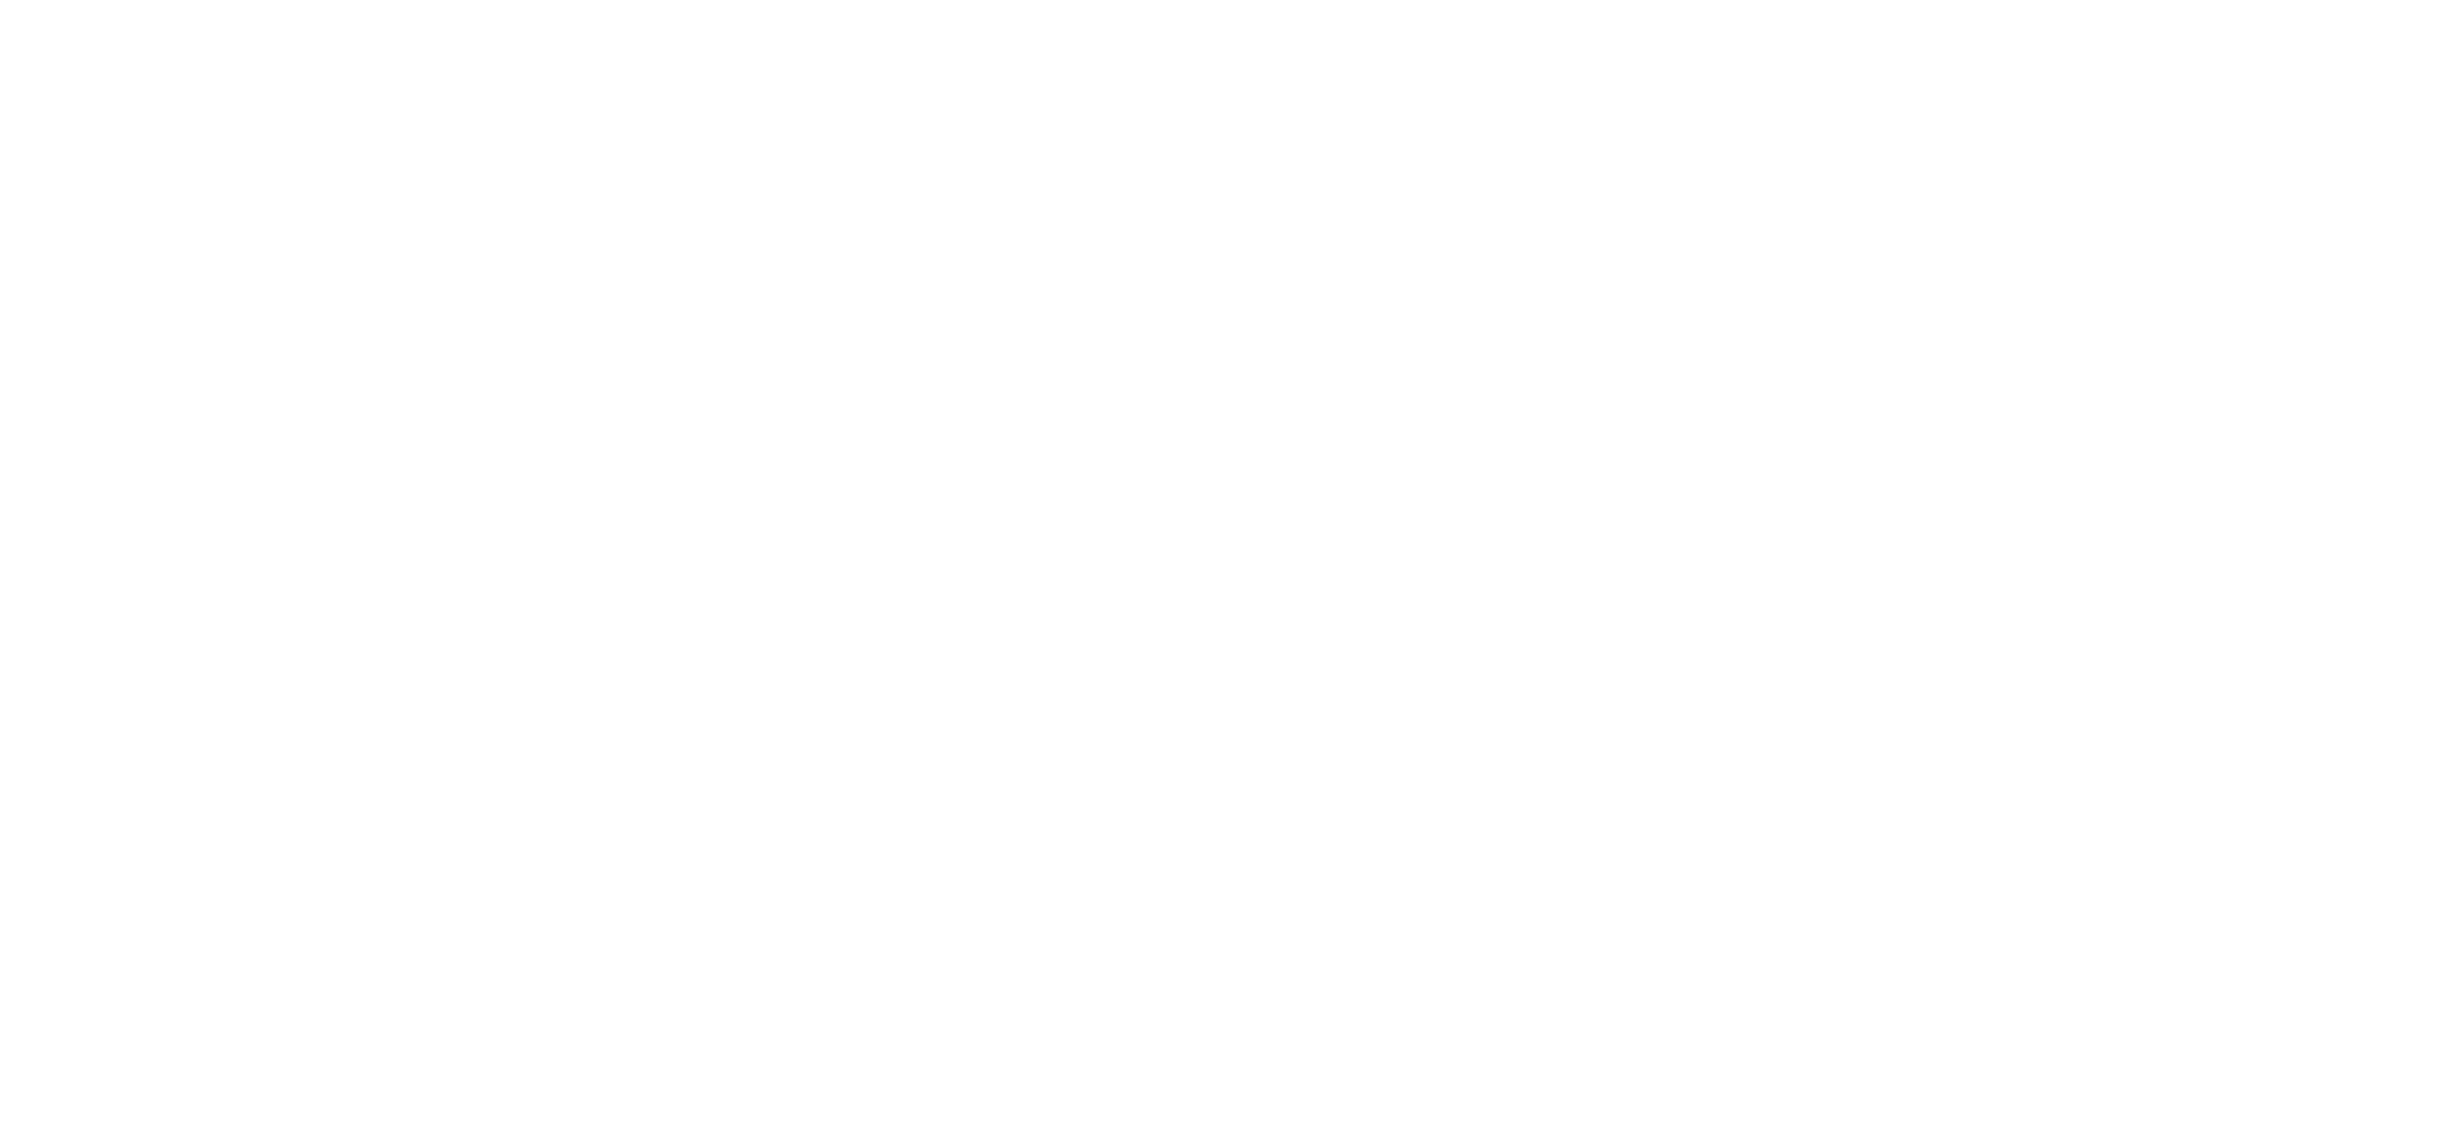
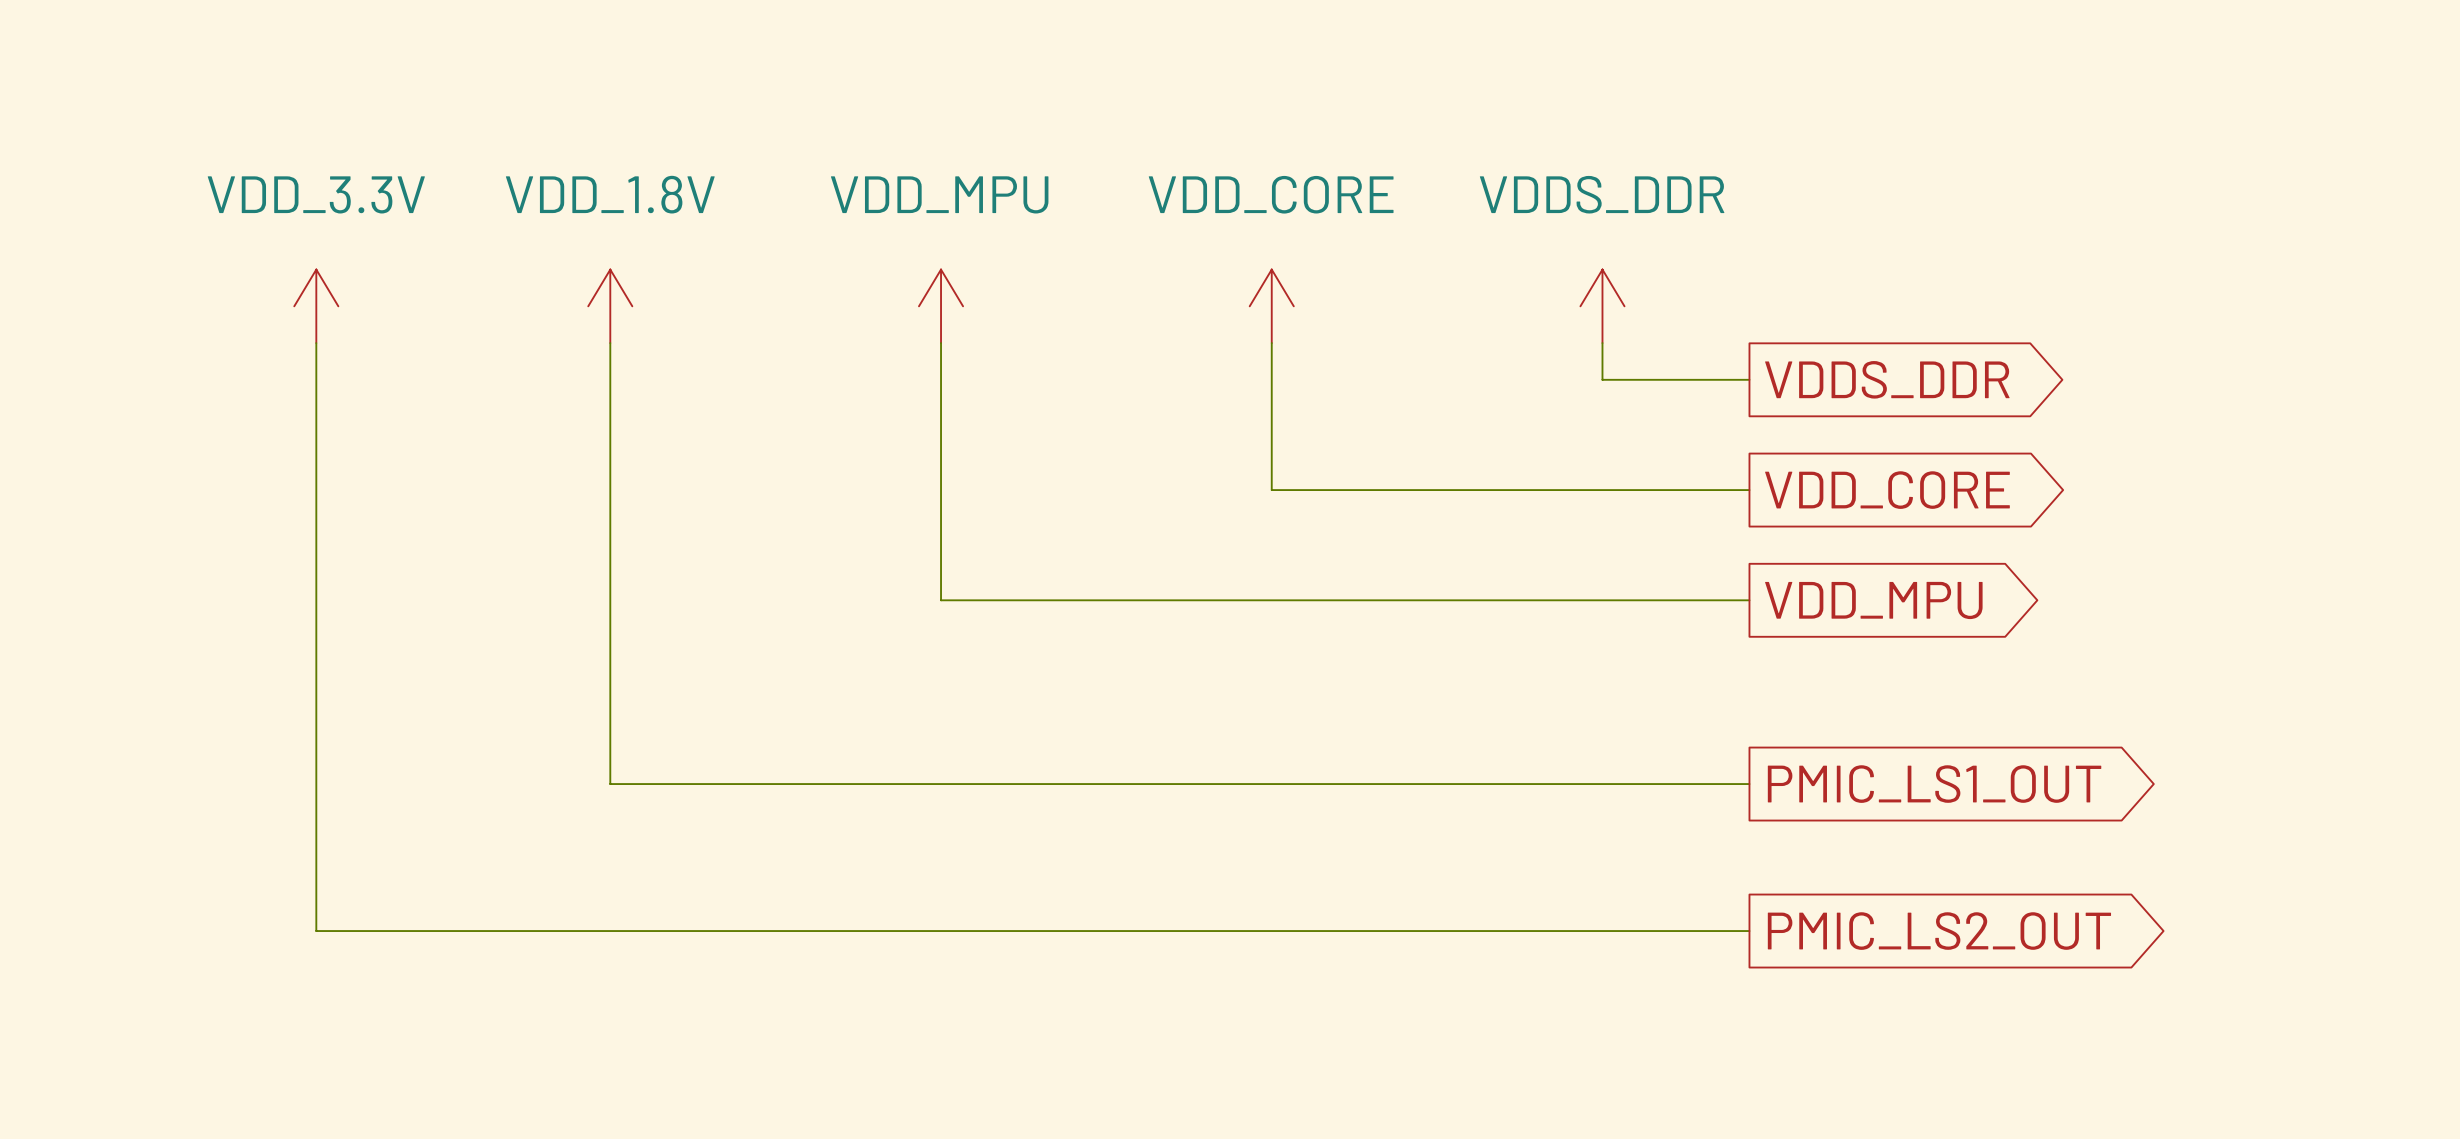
power symbol: none -> VDD_3.3V (316, 306)
power symbol: none -> VDD_1.8V (610, 306)
power symbol: none -> VDD_MPU (941, 306)
power symbol: none -> VDD_CORE (1271, 306)
power symbol: none -> VDDS_DDR (1602, 306)
wire: none -> (316, 343) (316, 931) (1749, 931)
wire: none -> (610, 343) (610, 784) (1749, 784)
wire: none -> (941, 343) (941, 600) (1749, 600)
wire: none -> (1271, 343) (1271, 490) (1749, 490)
wire: none -> (1602, 343) (1602, 379) (1749, 379)
global label: none -> VDDS_DDR (1887, 379)
global label: none -> VDD_CORE (1887, 490)
global label: none -> VDD_MPU (1873, 600)
global label: none -> PMIC_LS1_OUT (1934, 784)
global label: none -> PMIC_LS2_OUT (1939, 931)

